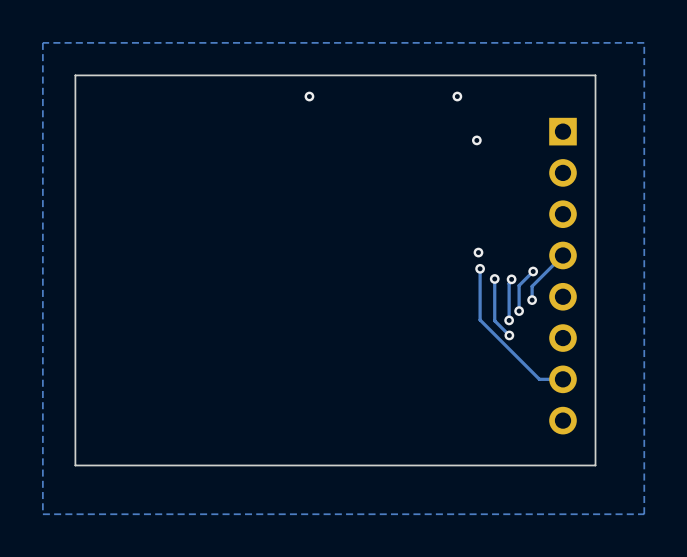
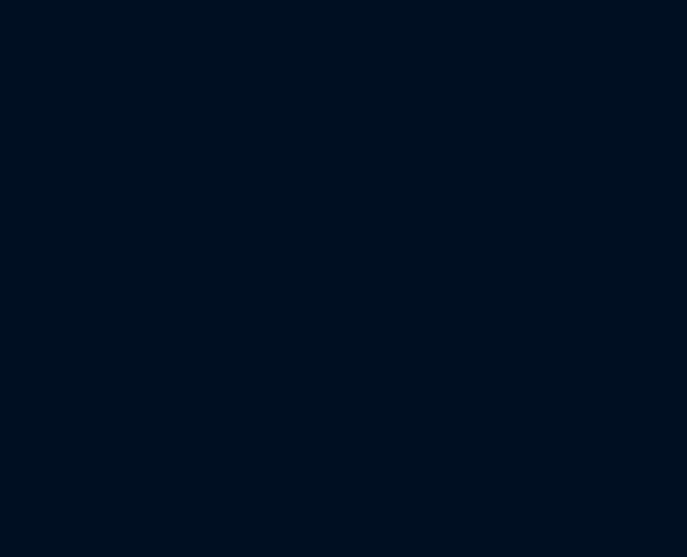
zone outline: (644, 42) (42, 42) (42, 514) (644, 514) (644, 42) -> none
board edge: (595, 75) (75, 75) (75, 465) (595, 465) (595, 75) -> none
via: (309, 96) -> none
via: (457, 96) -> none
via: (476, 140) -> none
via: (478, 252) -> none
track: (563, 255) (532, 286) (532, 300) -> none
track: (480, 268) (480, 319) (539, 379) (563, 379) -> none
via: (480, 268) -> none
track: (533, 271) (519, 285) (519, 311) -> none
via: (533, 271) -> none
part: (563, 276) -> none
track: (494, 278) (494, 320) (509, 335) -> none
via: (494, 278) -> none
track: (511, 279) (509, 283) (509, 320) -> none
via: (511, 279) -> none
via: (532, 300) -> none
via: (519, 311) -> none
via: (509, 320) -> none
via: (509, 335) -> none

